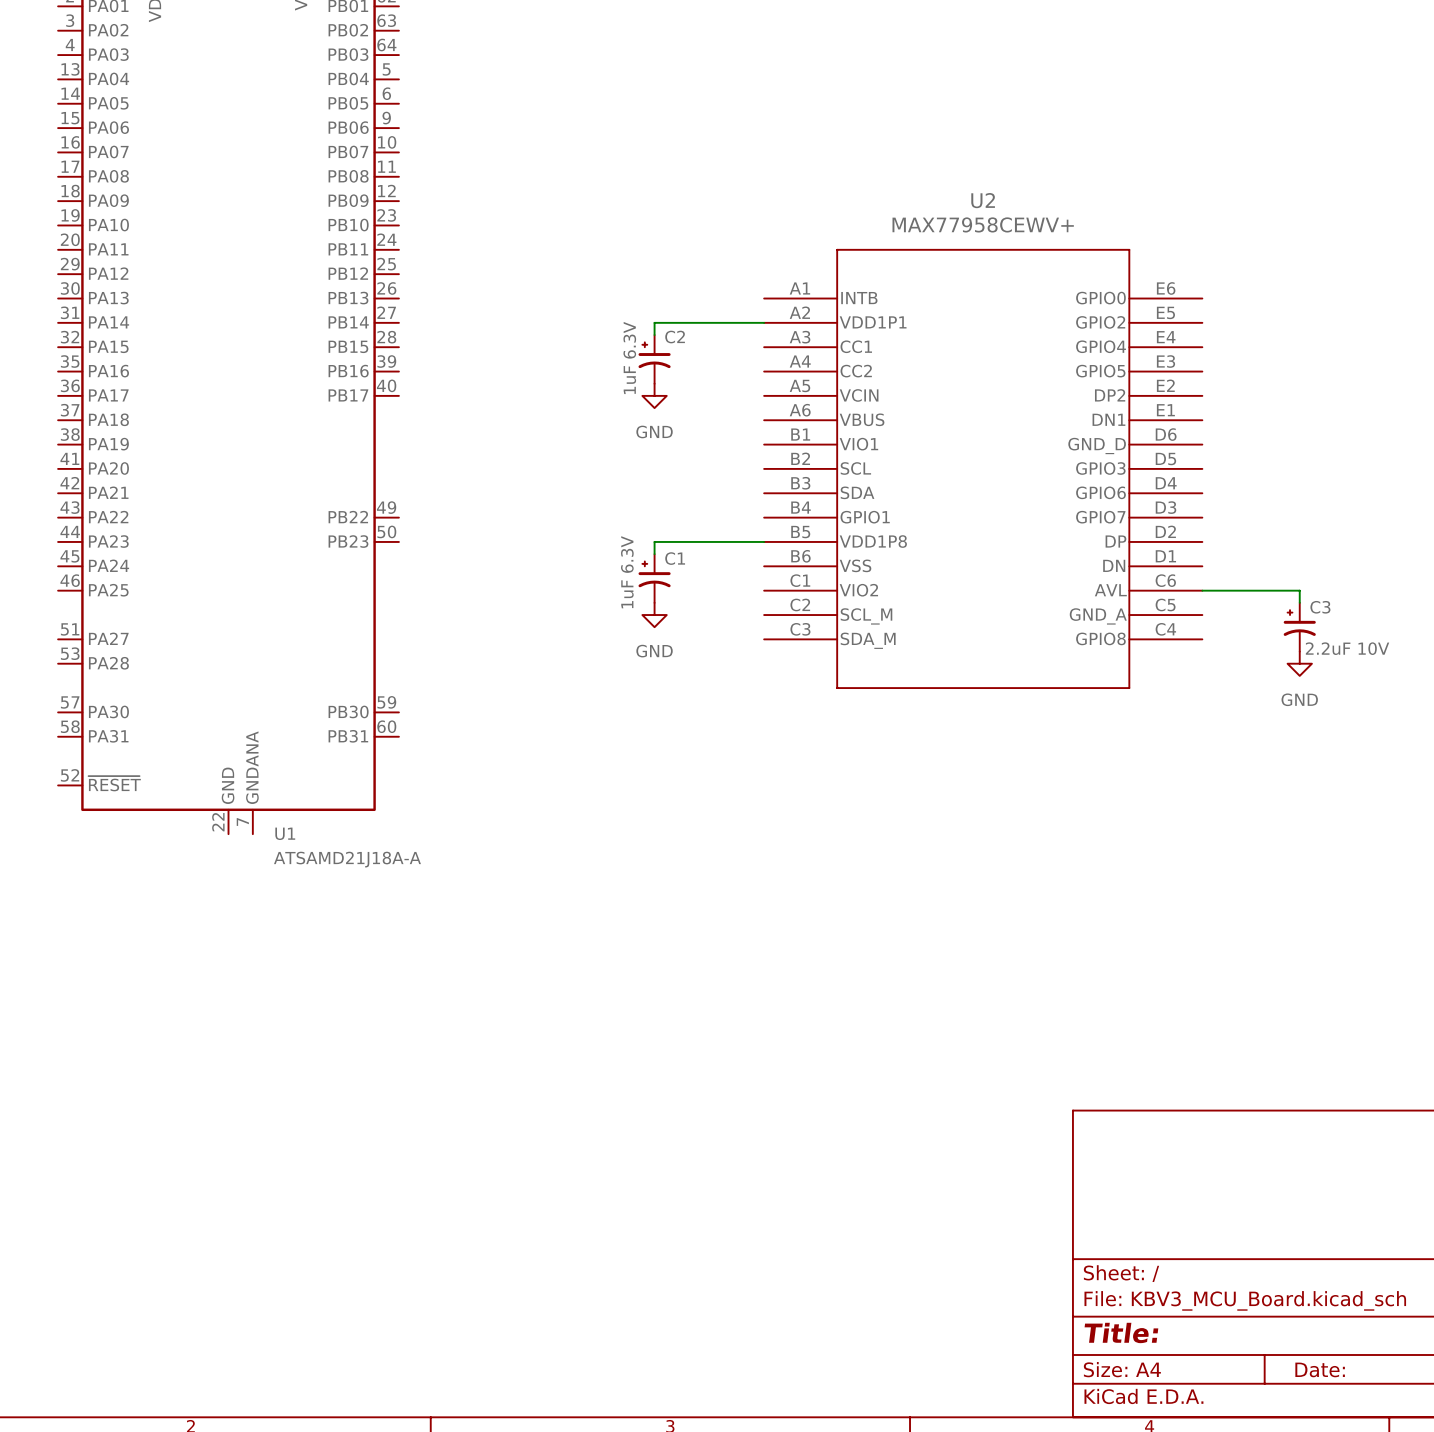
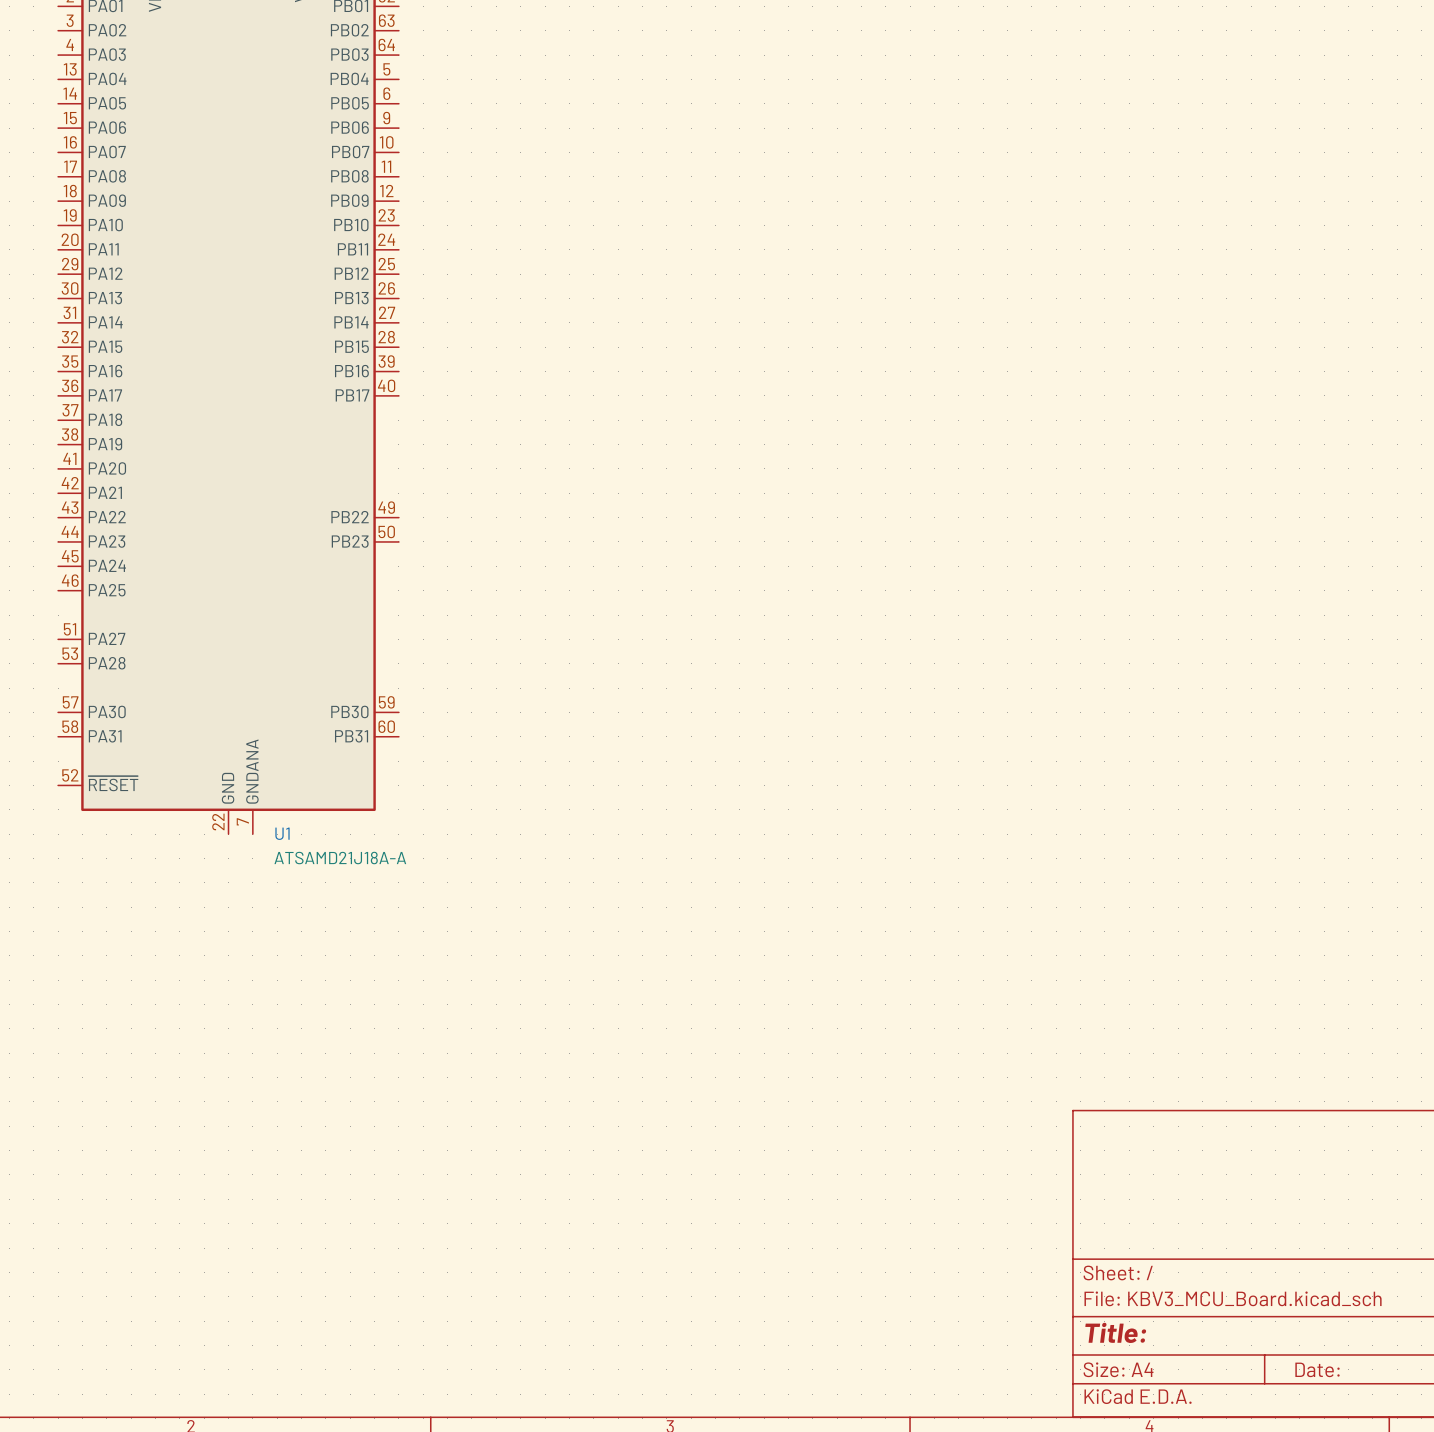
wire: (764, 322) (654, 322) (654, 335) -> none
C2: 1uF 6.3V (654, 359) -> none
power symbol: GND (654, 395) -> none
U2: MAX77958CEWV+ (983, 468) -> none
wire: (764, 541) (654, 541) (654, 554) -> none
C1: 1uF 6.3V (654, 578) -> none
wire: (1202, 590) (1299, 590) (1299, 602) -> none
power symbol: GND (654, 615) -> none
C3: 2.2uF 10V (1299, 627) -> none
power symbol: GND (1299, 663) -> none

